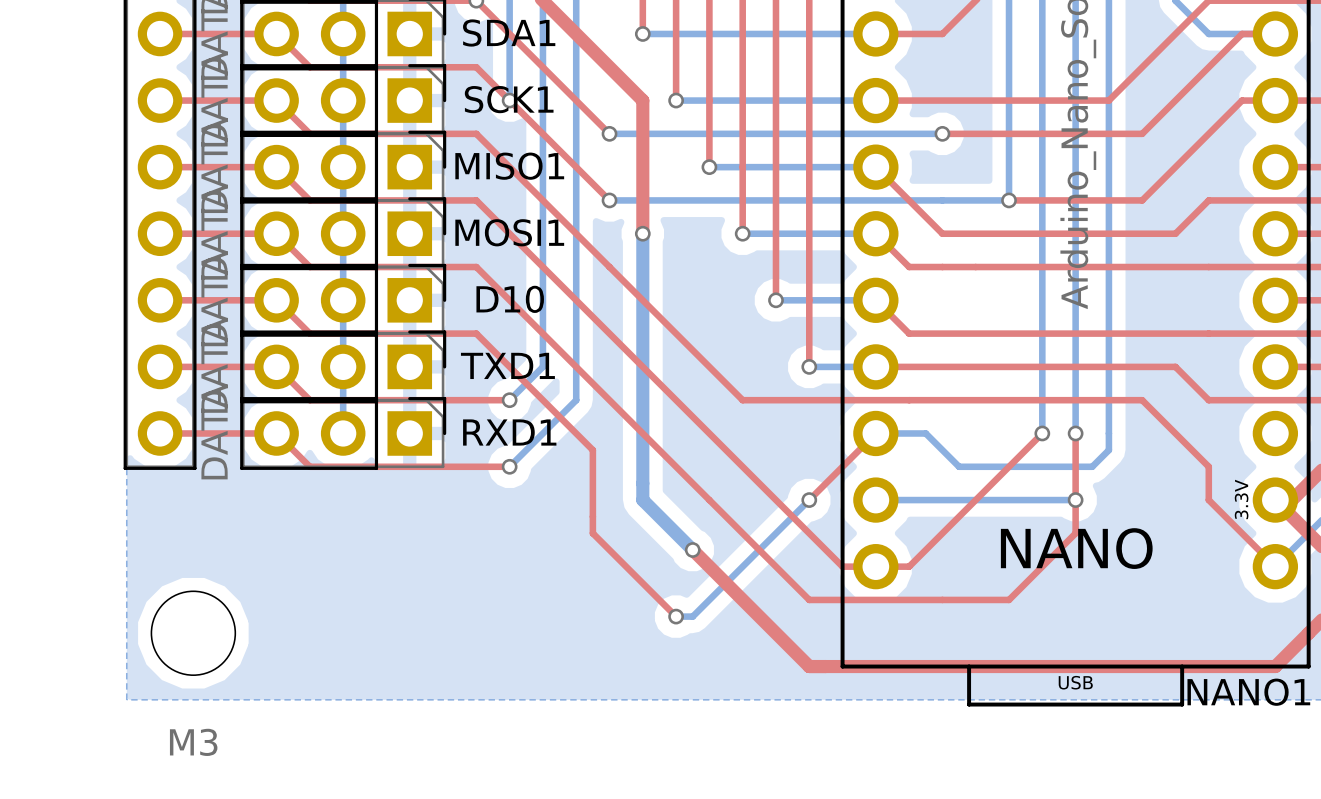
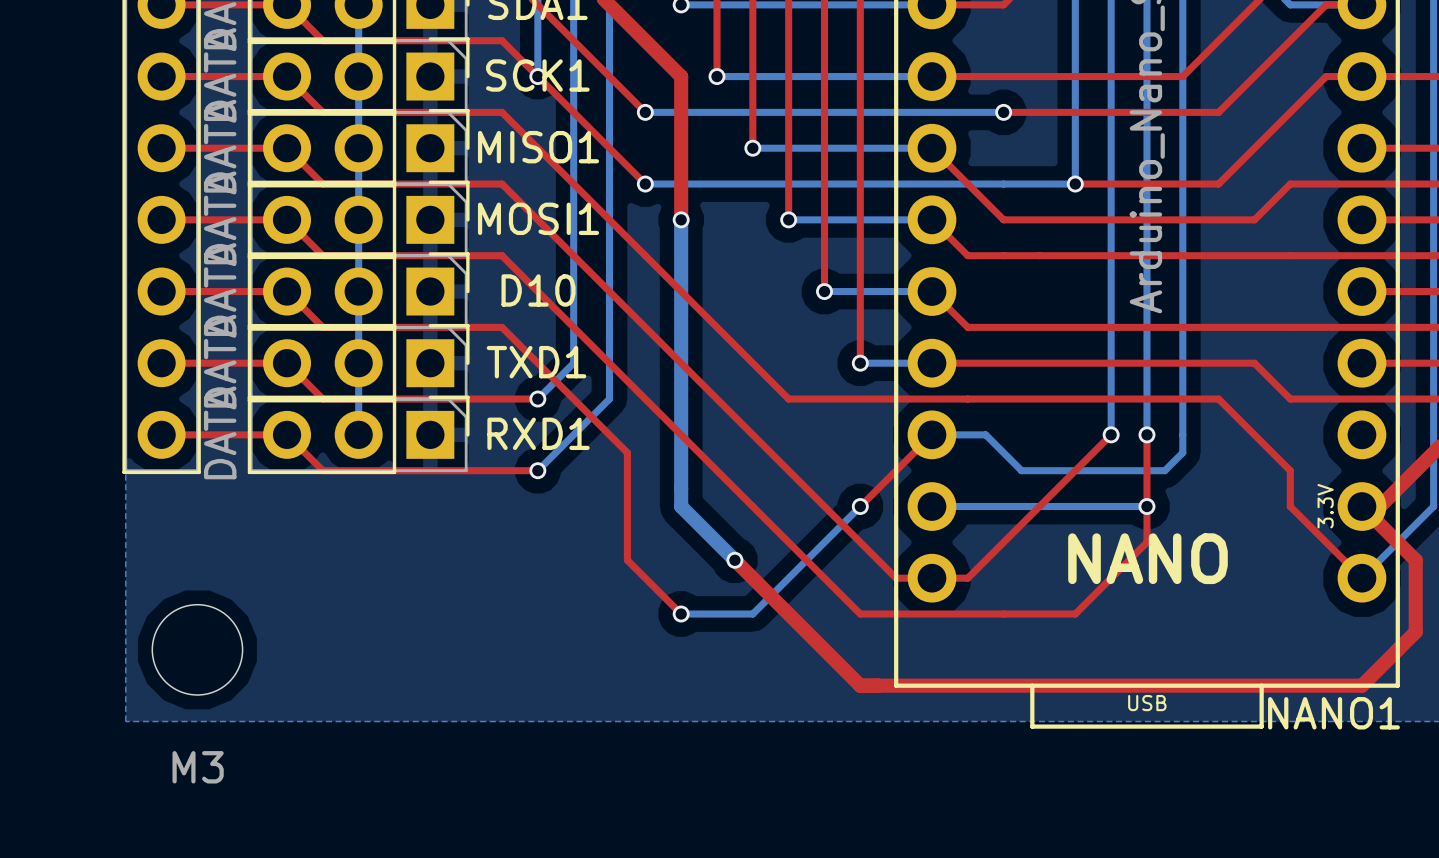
top track: (592, 533) (676, 616) -> (627, 542) (627, 560) (681, 614)
bottom track: (709, 599) (692, 616) (676, 616) -> (752, 614) (681, 614)
via position: (676, 616) -> (681, 614)

